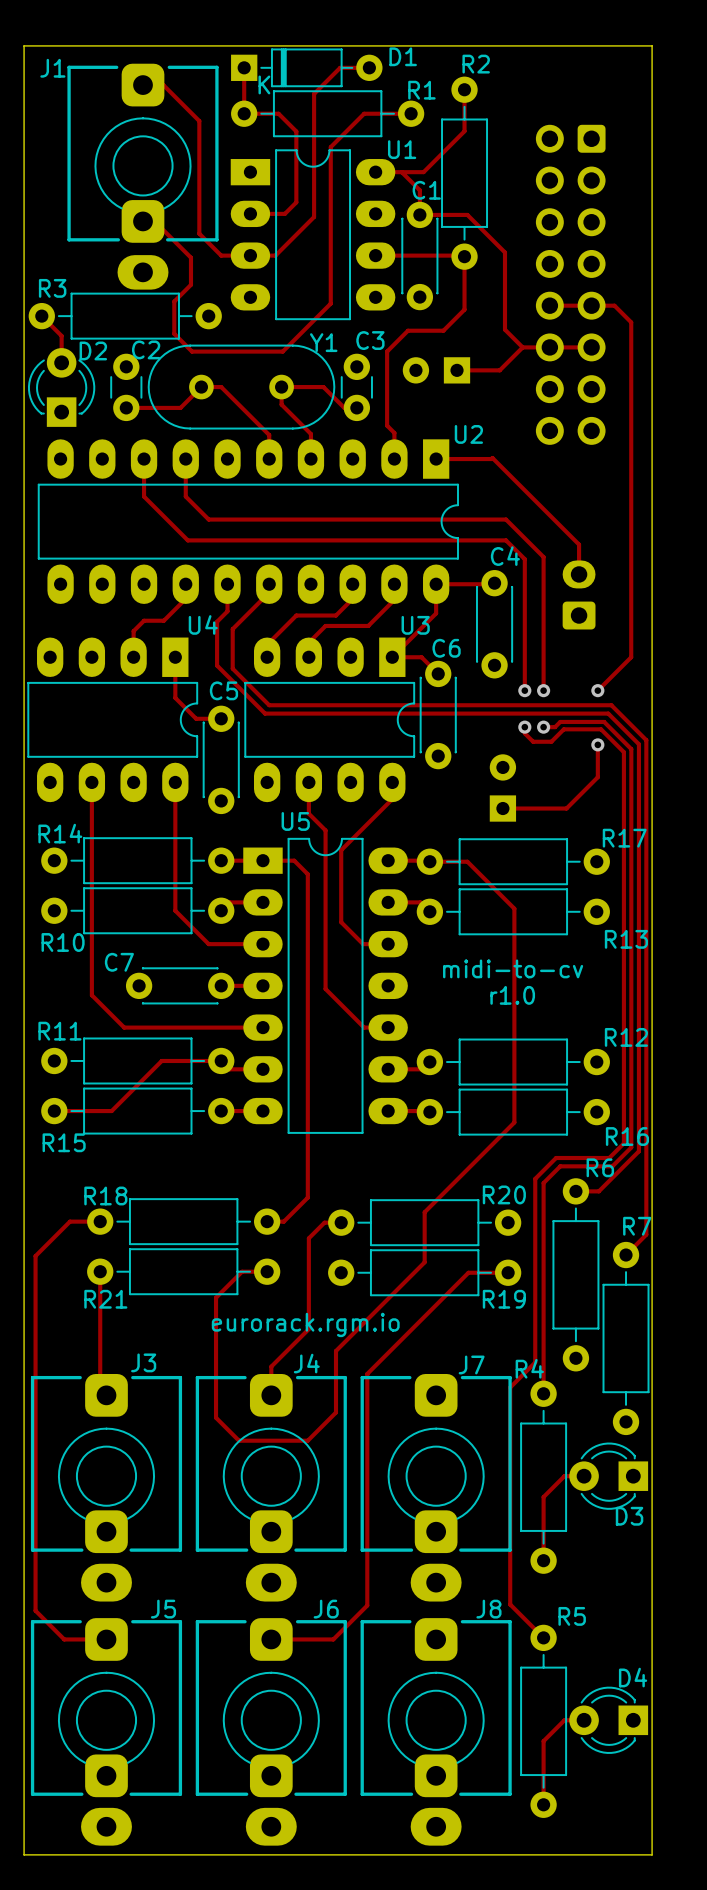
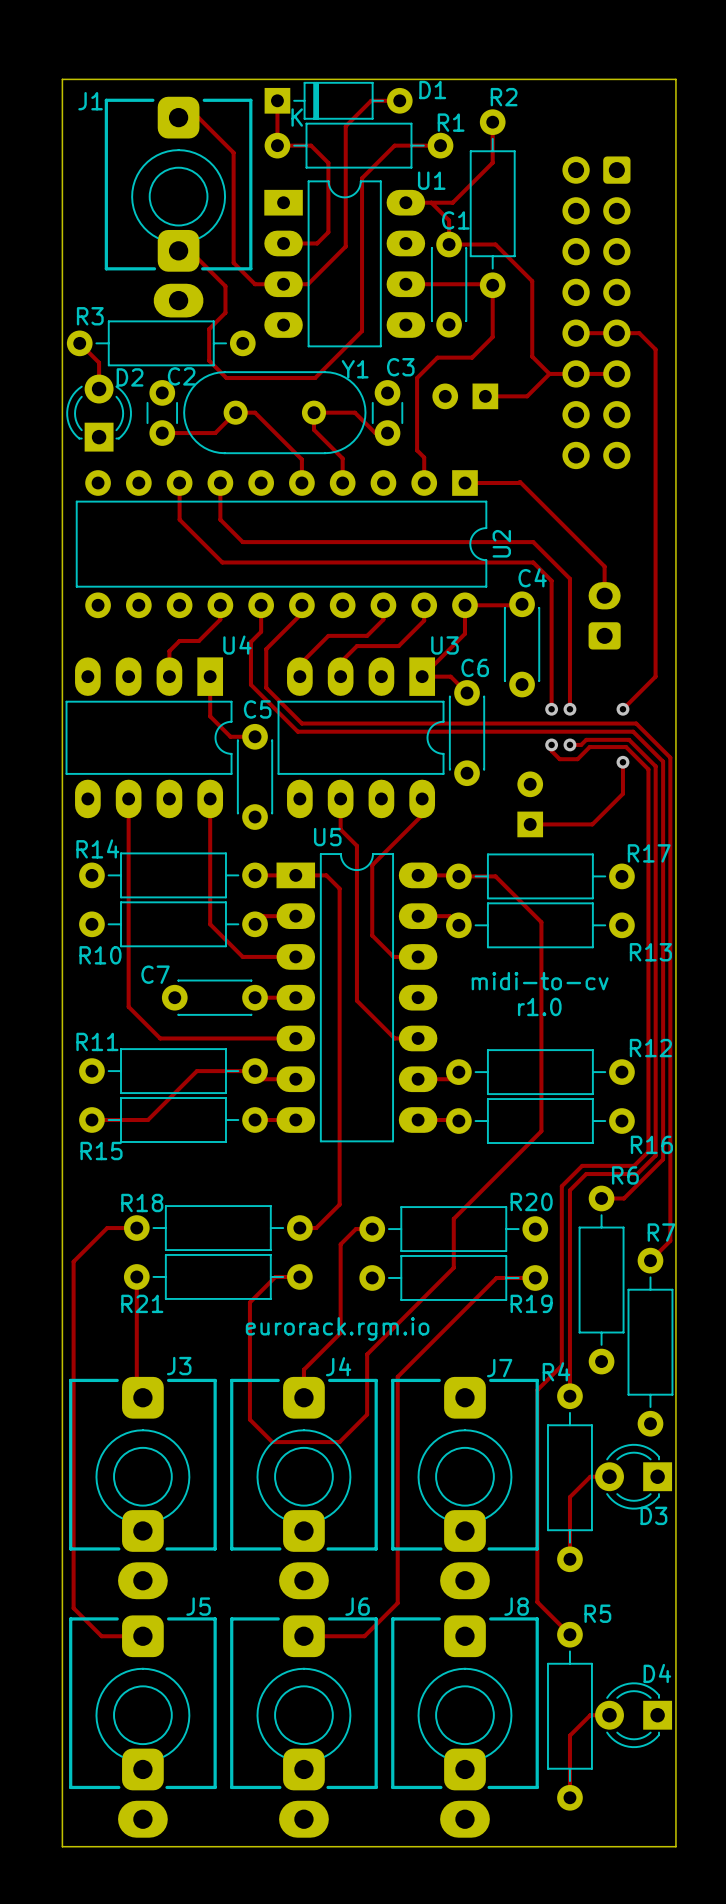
U2 name position: U2 (468, 434) -> U2 (501, 543)
U2 footprint: [37, 439, 459, 604] -> [75, 470, 488, 619]

